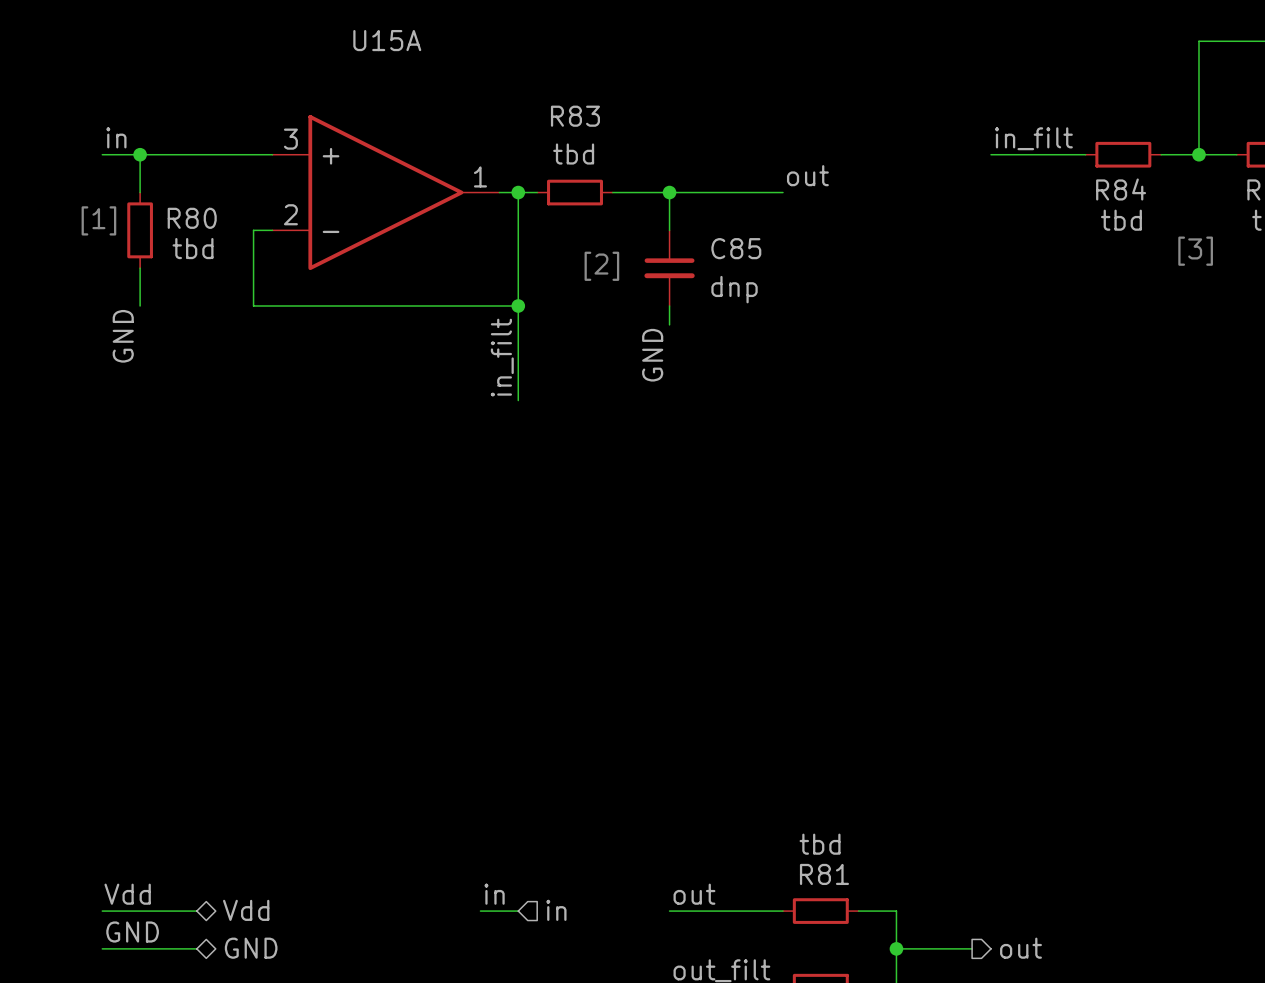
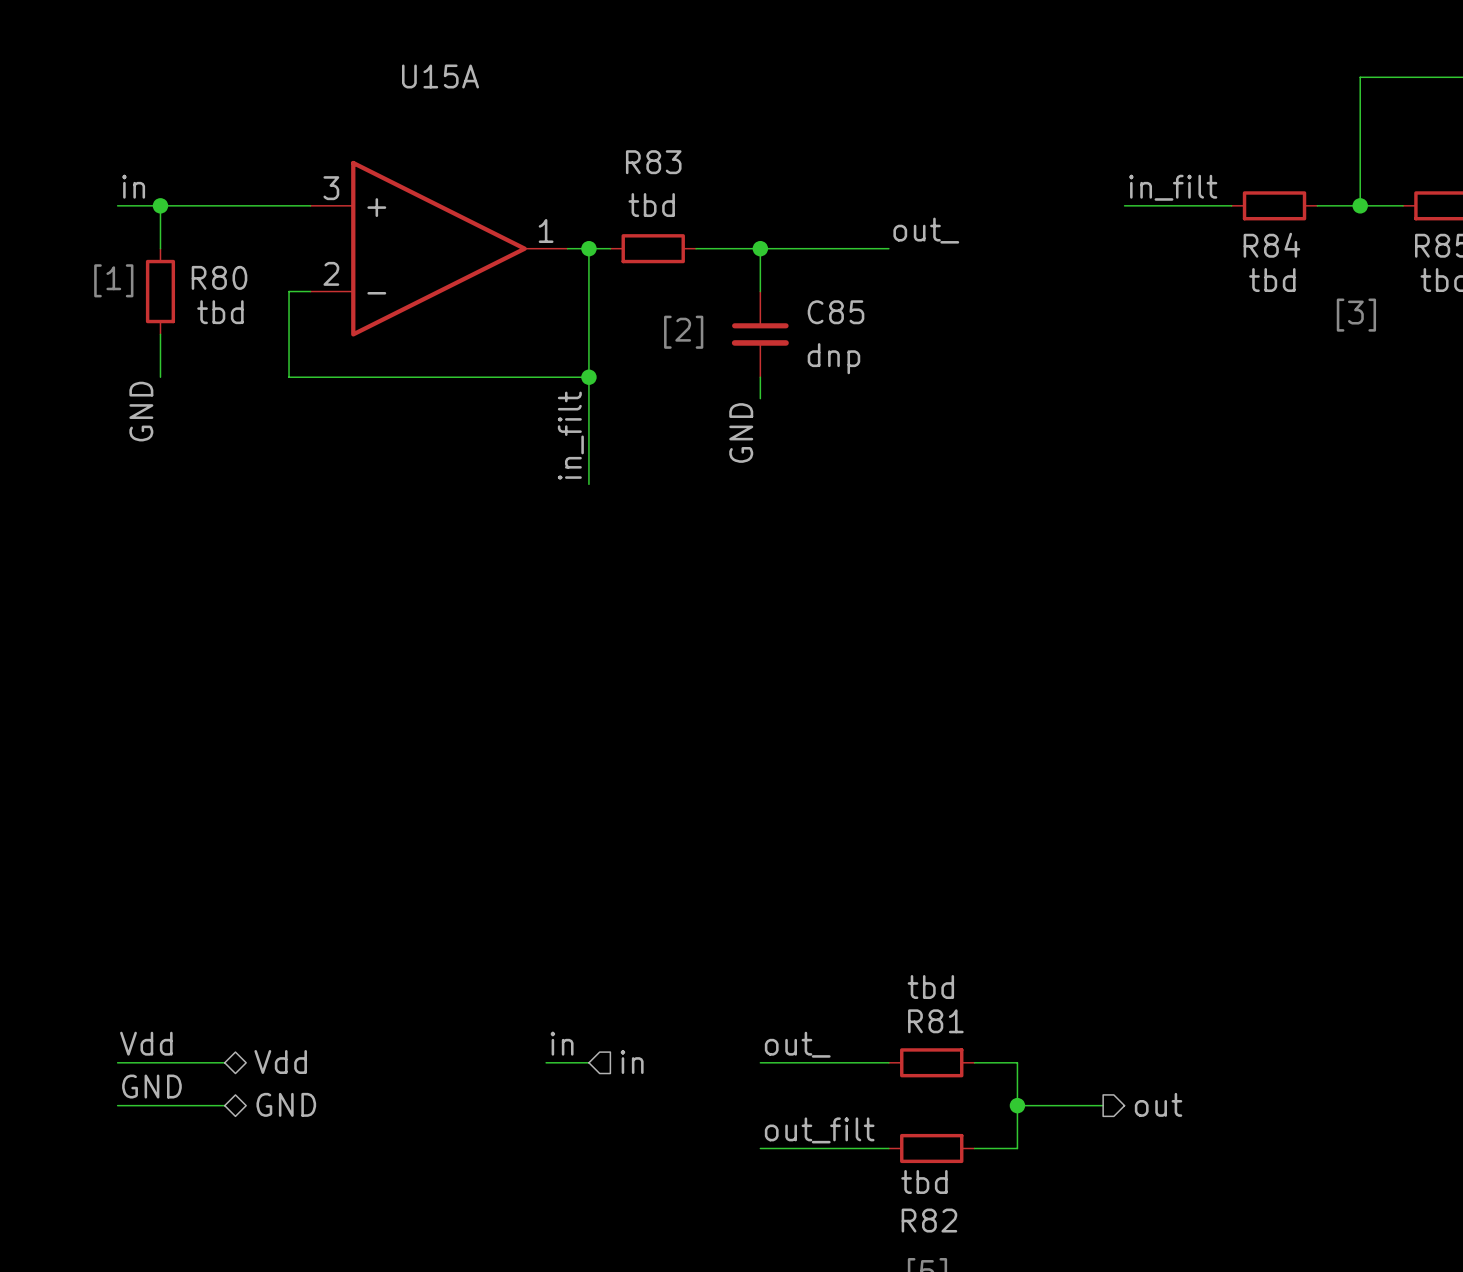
label: out (807, 175) -> out_ (926, 230)
label: out (694, 894) -> out_ (797, 1044)

